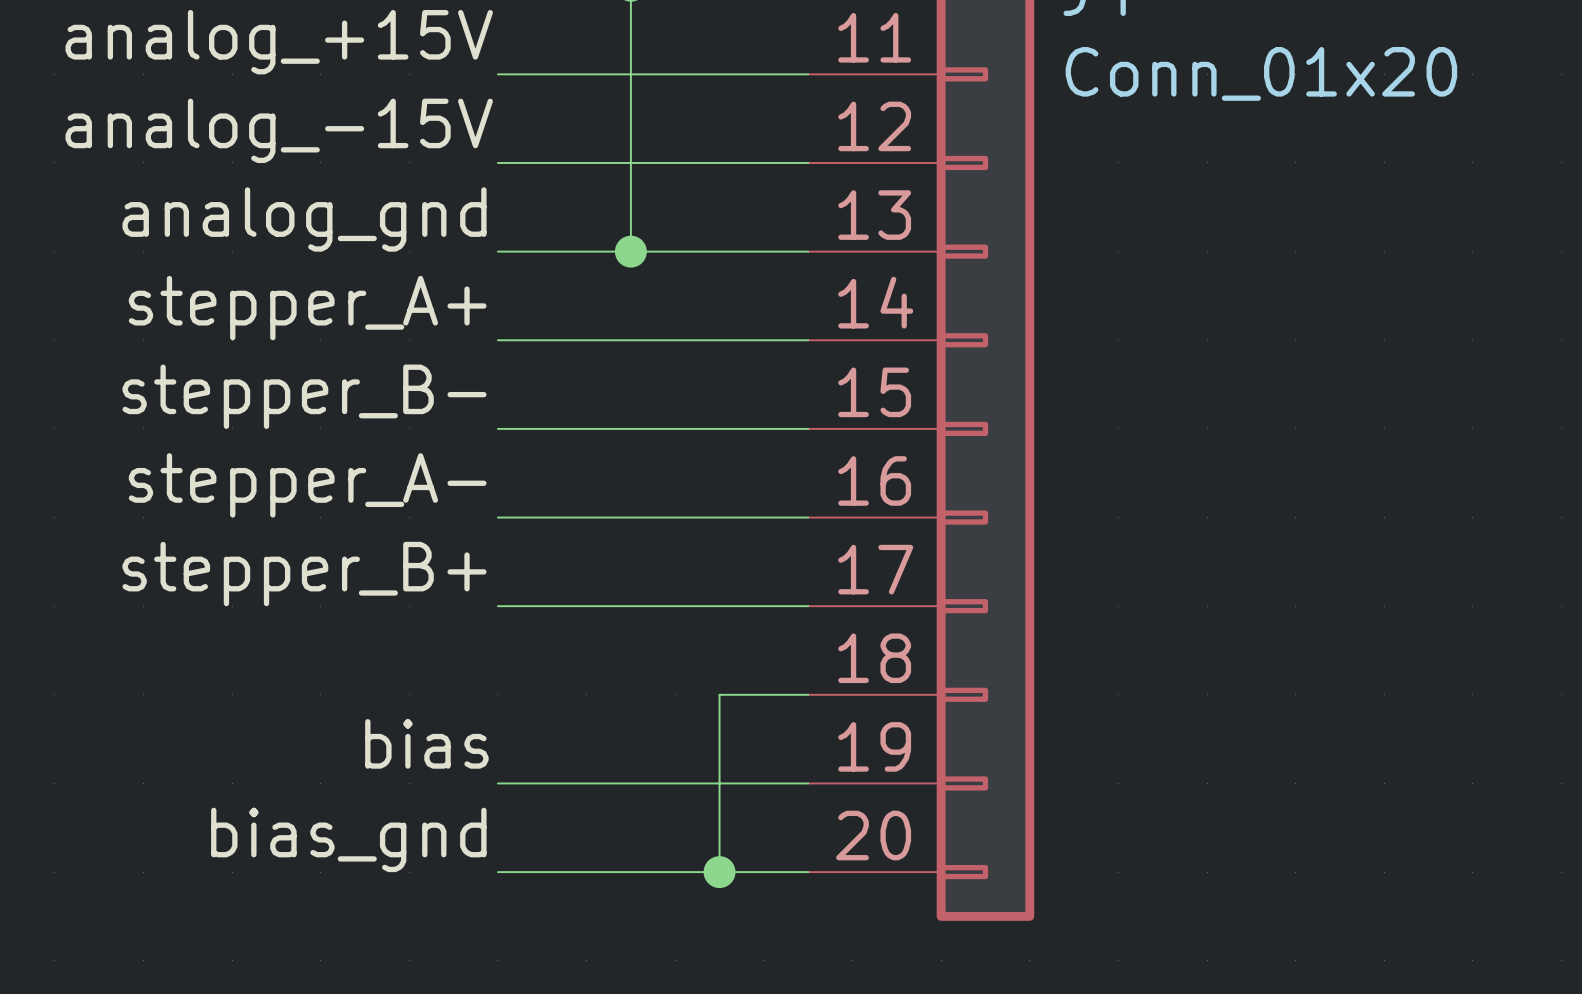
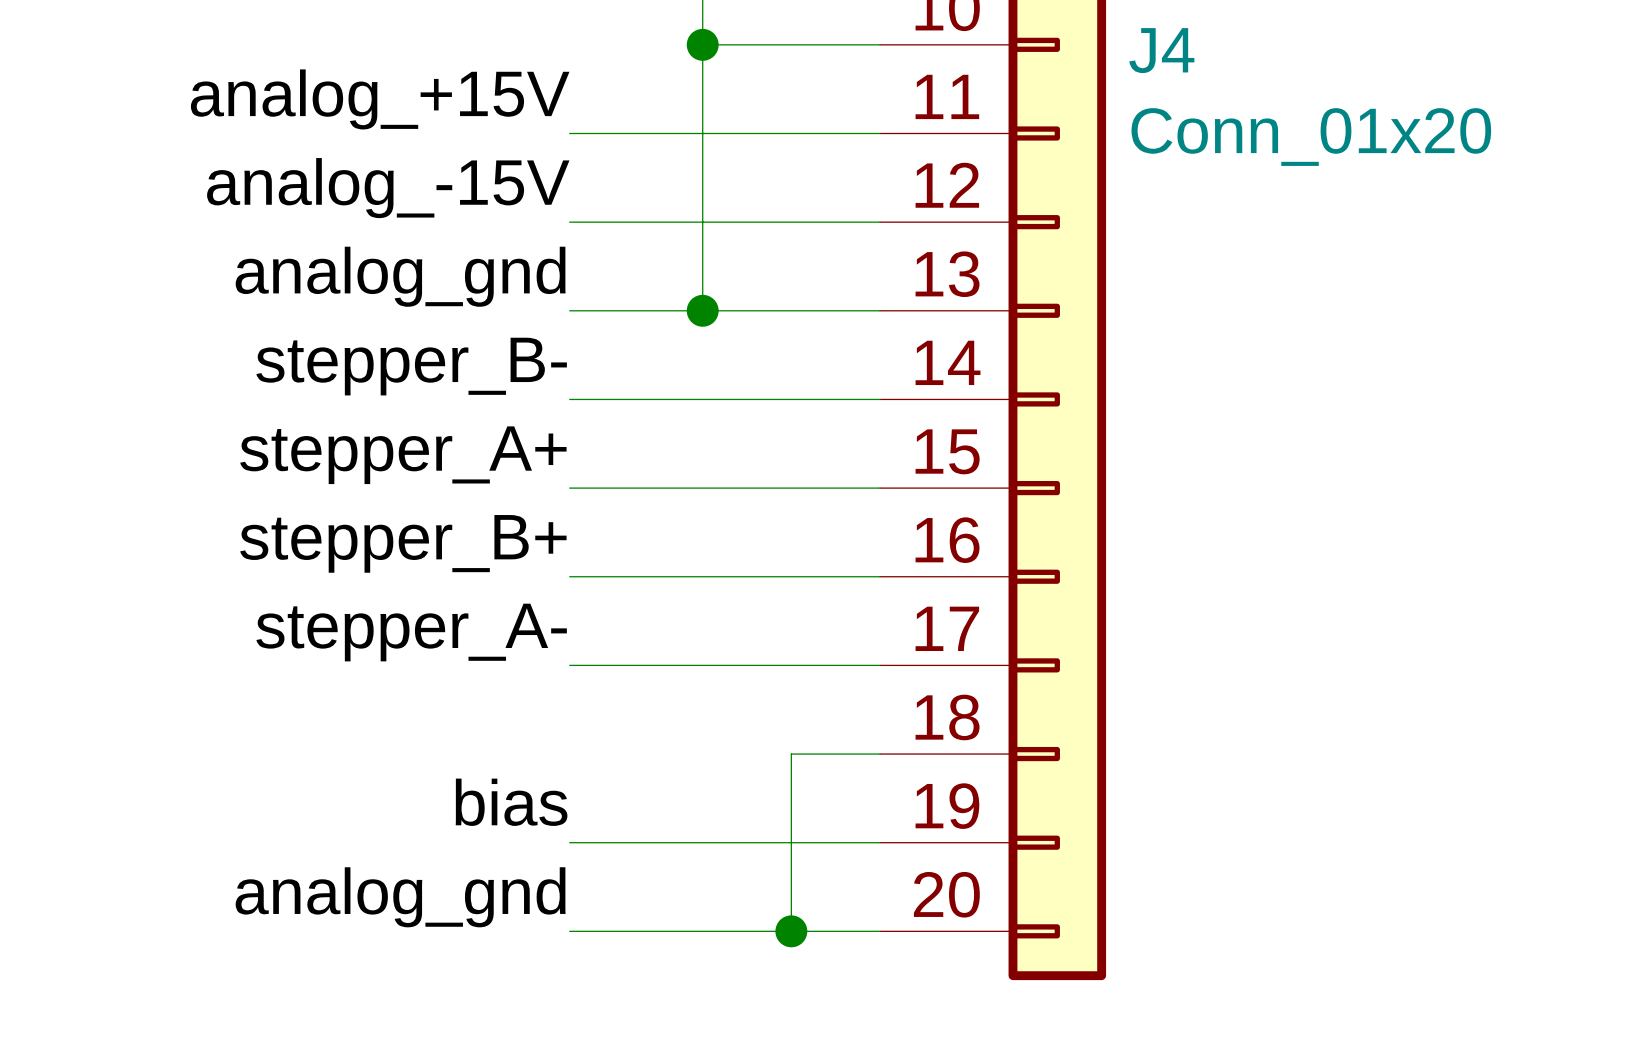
label: stepper_A+ (307, 308) -> stepper_B- (411, 366)
label: stepper_B- (304, 396) -> stepper_A+ (403, 455)
label: stepper_A- (307, 485) -> stepper_B+ (403, 543)
label: stepper_B+ (304, 574) -> stepper_A- (411, 632)
label: bias_gnd (348, 839) -> analog_gnd (400, 897)

